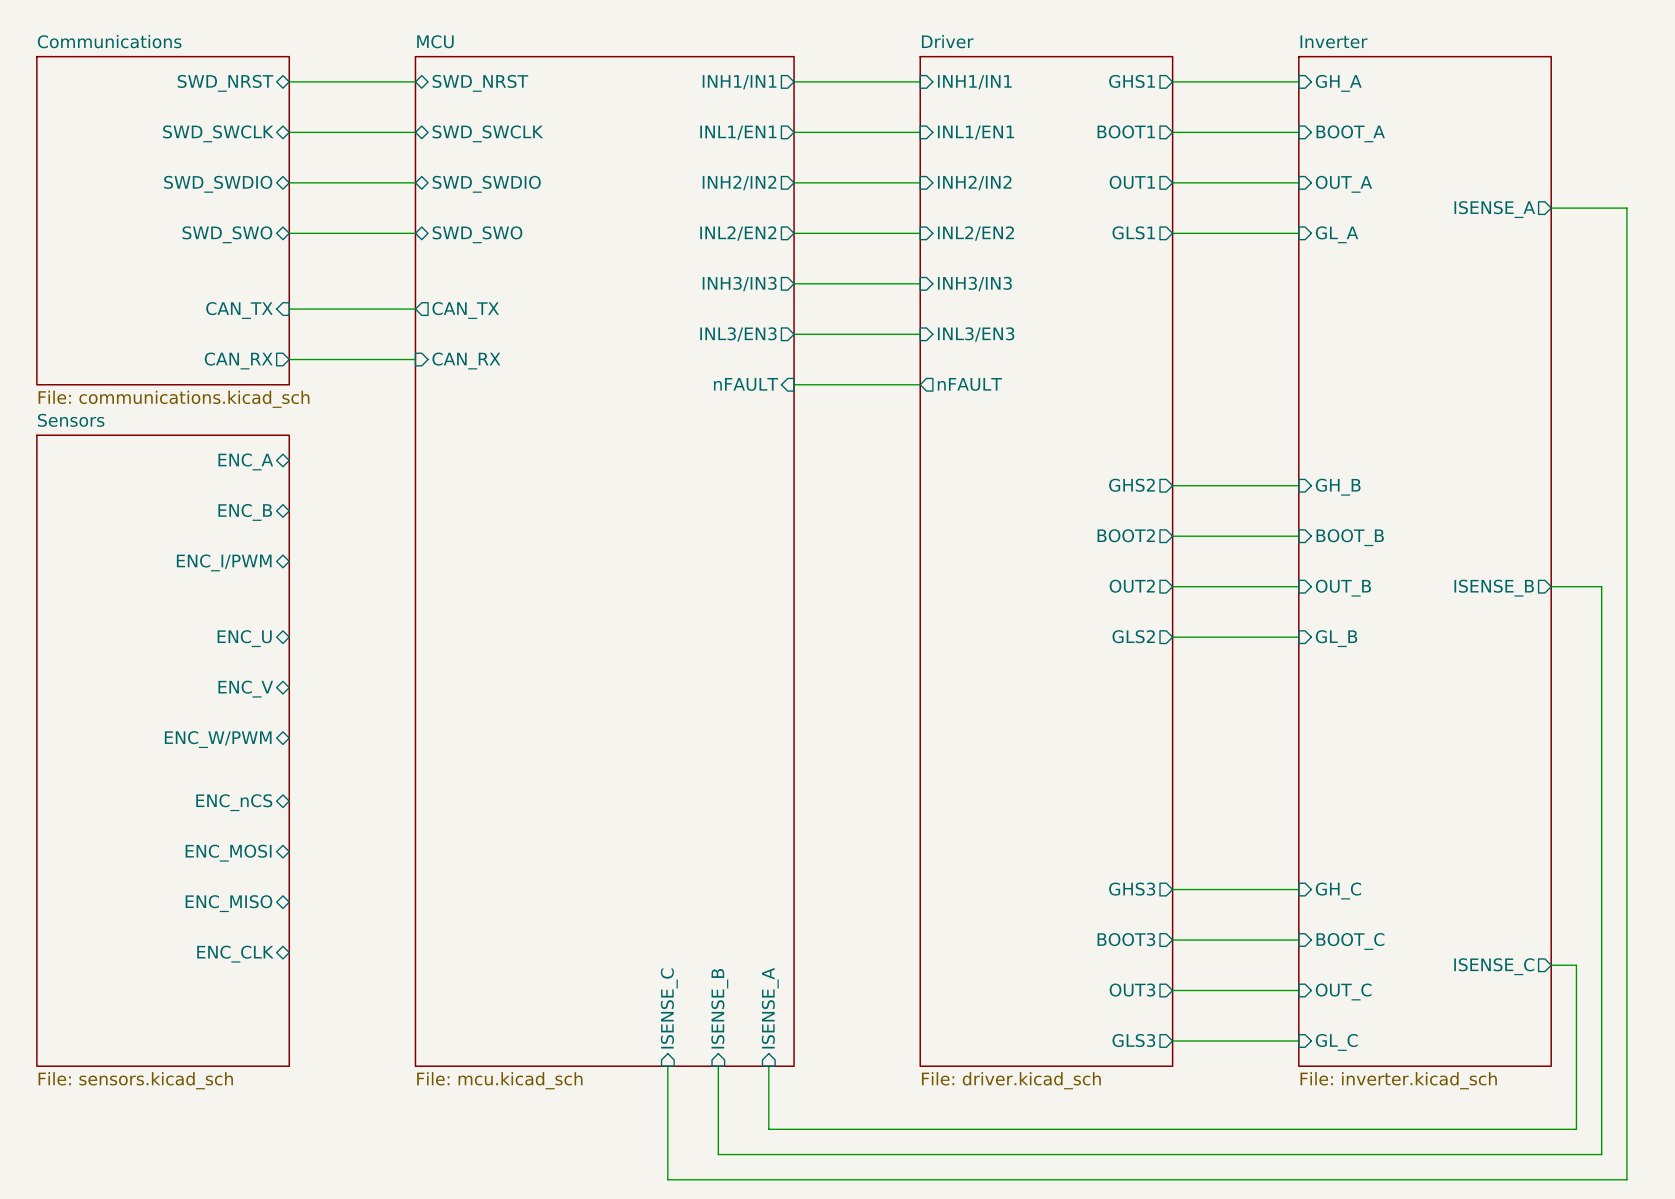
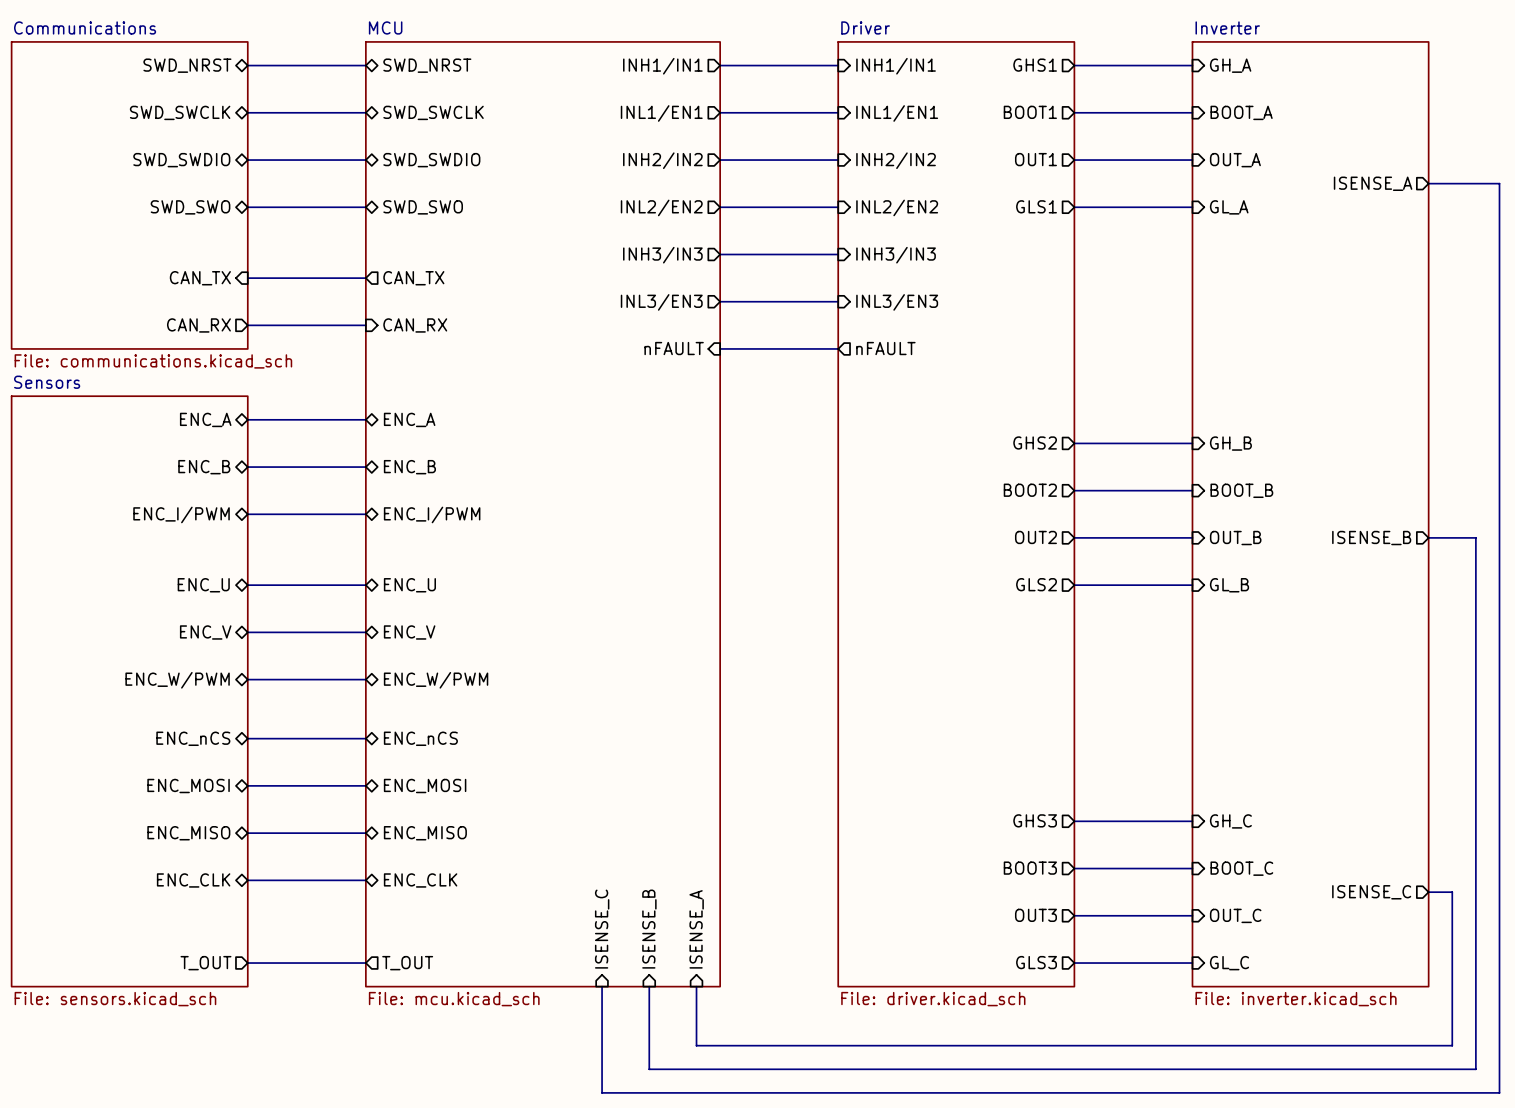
wire: none -> (247, 419) (365, 419)
sheet pin: none -> ENC_A (409, 419)
wire: none -> (247, 467) (365, 467)
sheet pin: none -> ENC_B (409, 467)
wire: none -> (247, 514) (365, 514)
sheet pin: none -> ENC_I/PWM (432, 514)
wire: none -> (247, 585) (365, 585)
sheet pin: none -> ENC_U (409, 585)
wire: none -> (247, 632) (365, 632)
sheet pin: none -> ENC_V (409, 632)
wire: none -> (247, 679) (365, 679)
sheet pin: none -> ENC_W/PWM (436, 680)
wire: none -> (247, 738) (365, 738)
sheet pin: none -> ENC_nCS (420, 738)
wire: none -> (247, 785) (365, 785)
sheet pin: none -> ENC_MOSI (425, 786)
wire: none -> (247, 833) (365, 833)
sheet pin: none -> ENC_MISO (425, 833)
wire: none -> (247, 880) (365, 880)
sheet pin: none -> ENC_CLK (420, 880)
wire: none -> (247, 963) (365, 963)
sheet pin: none -> T_OUT (205, 963)
sheet pin: none -> T_OUT (407, 963)

